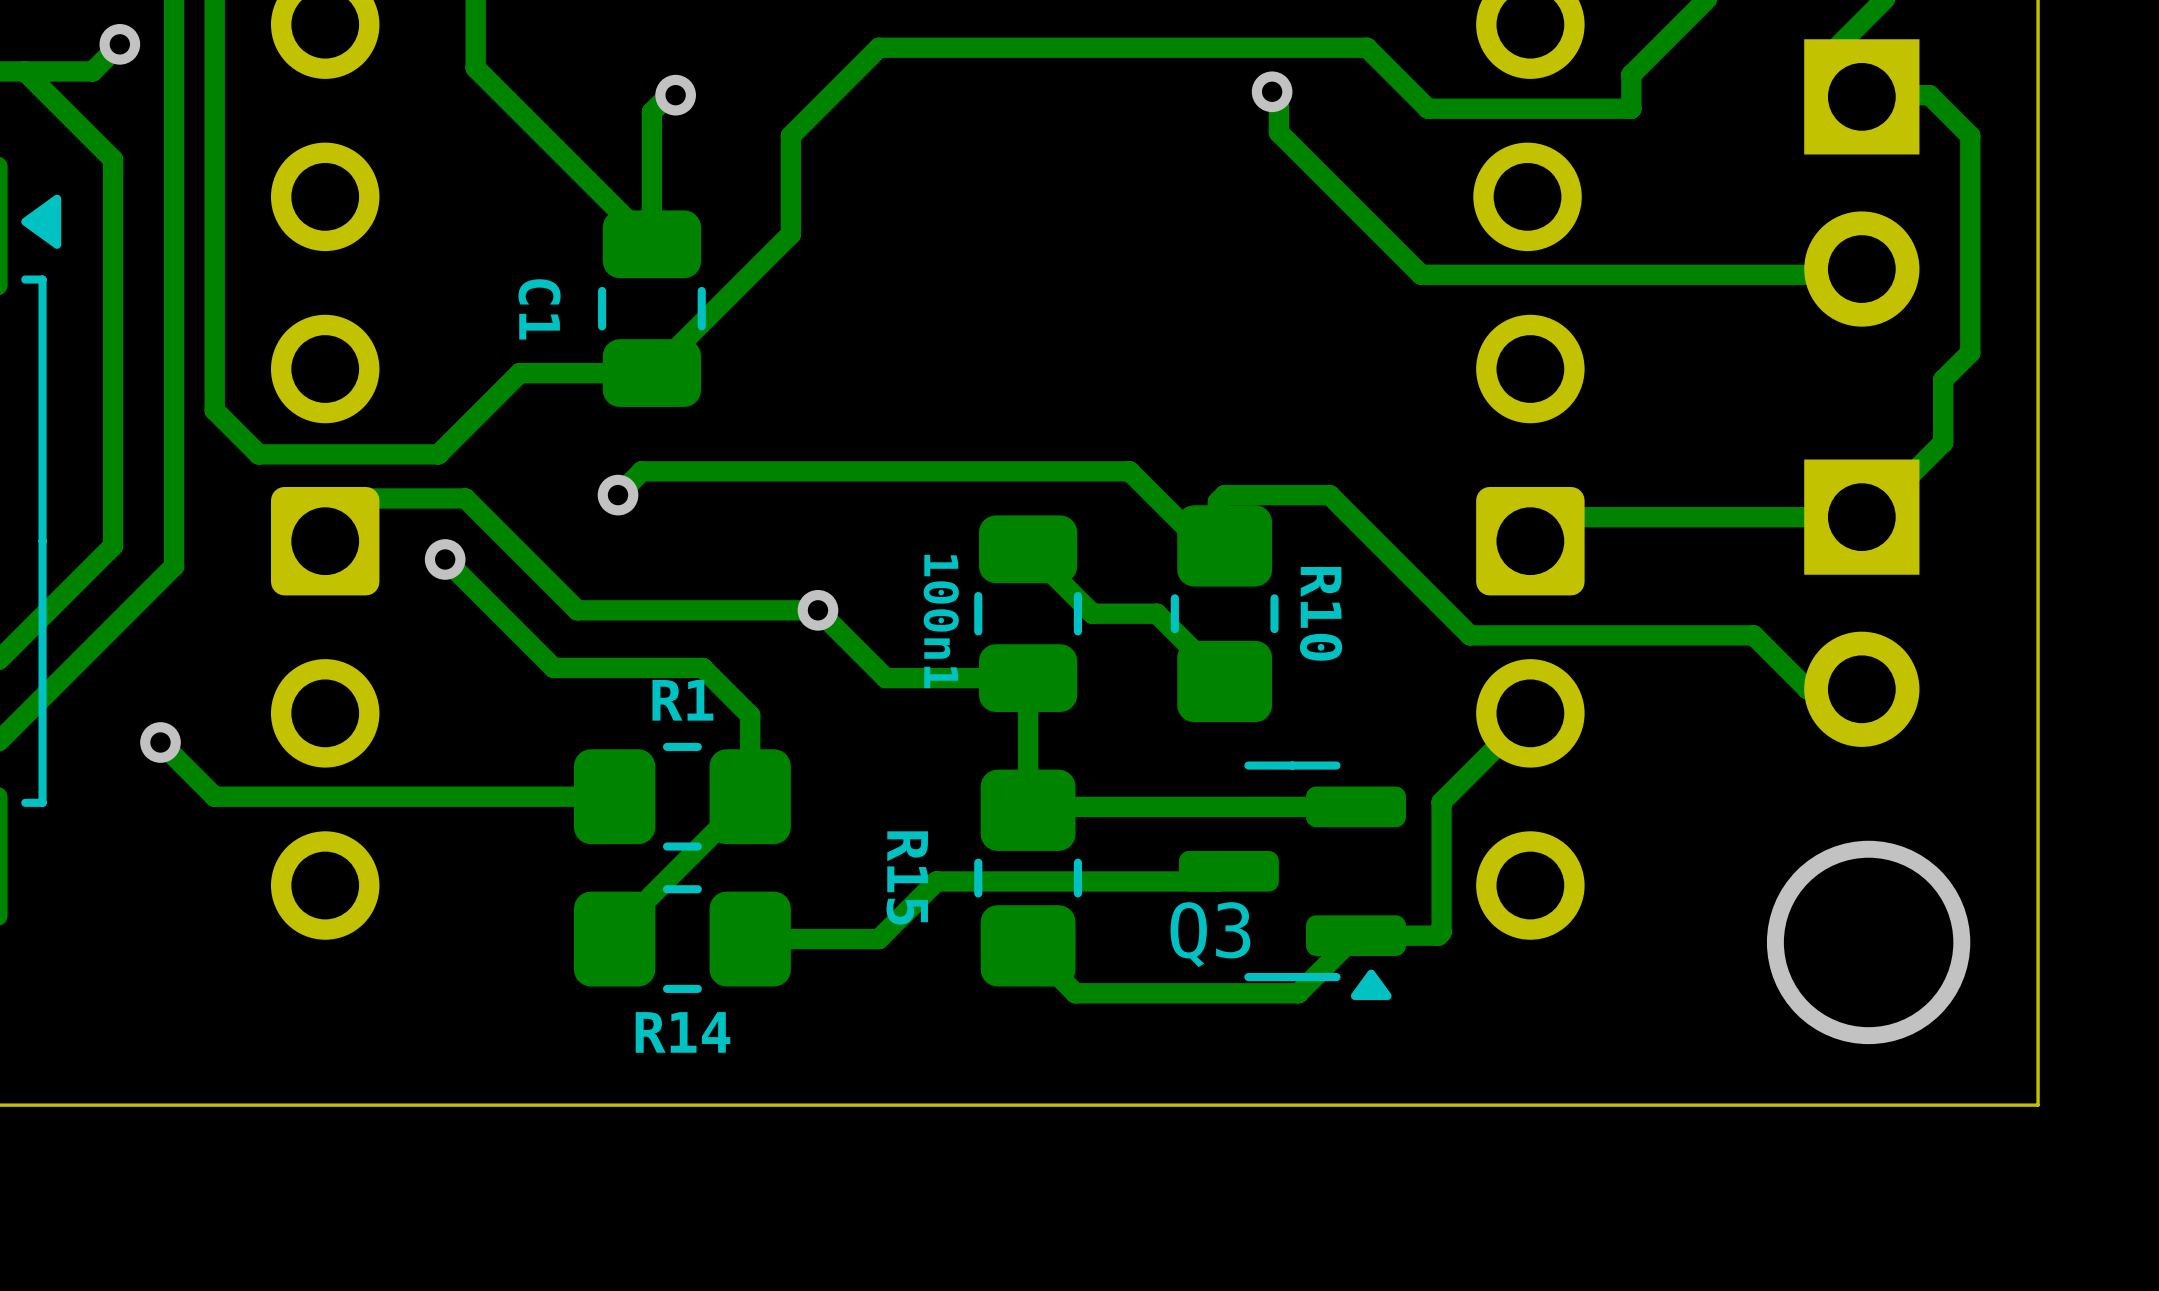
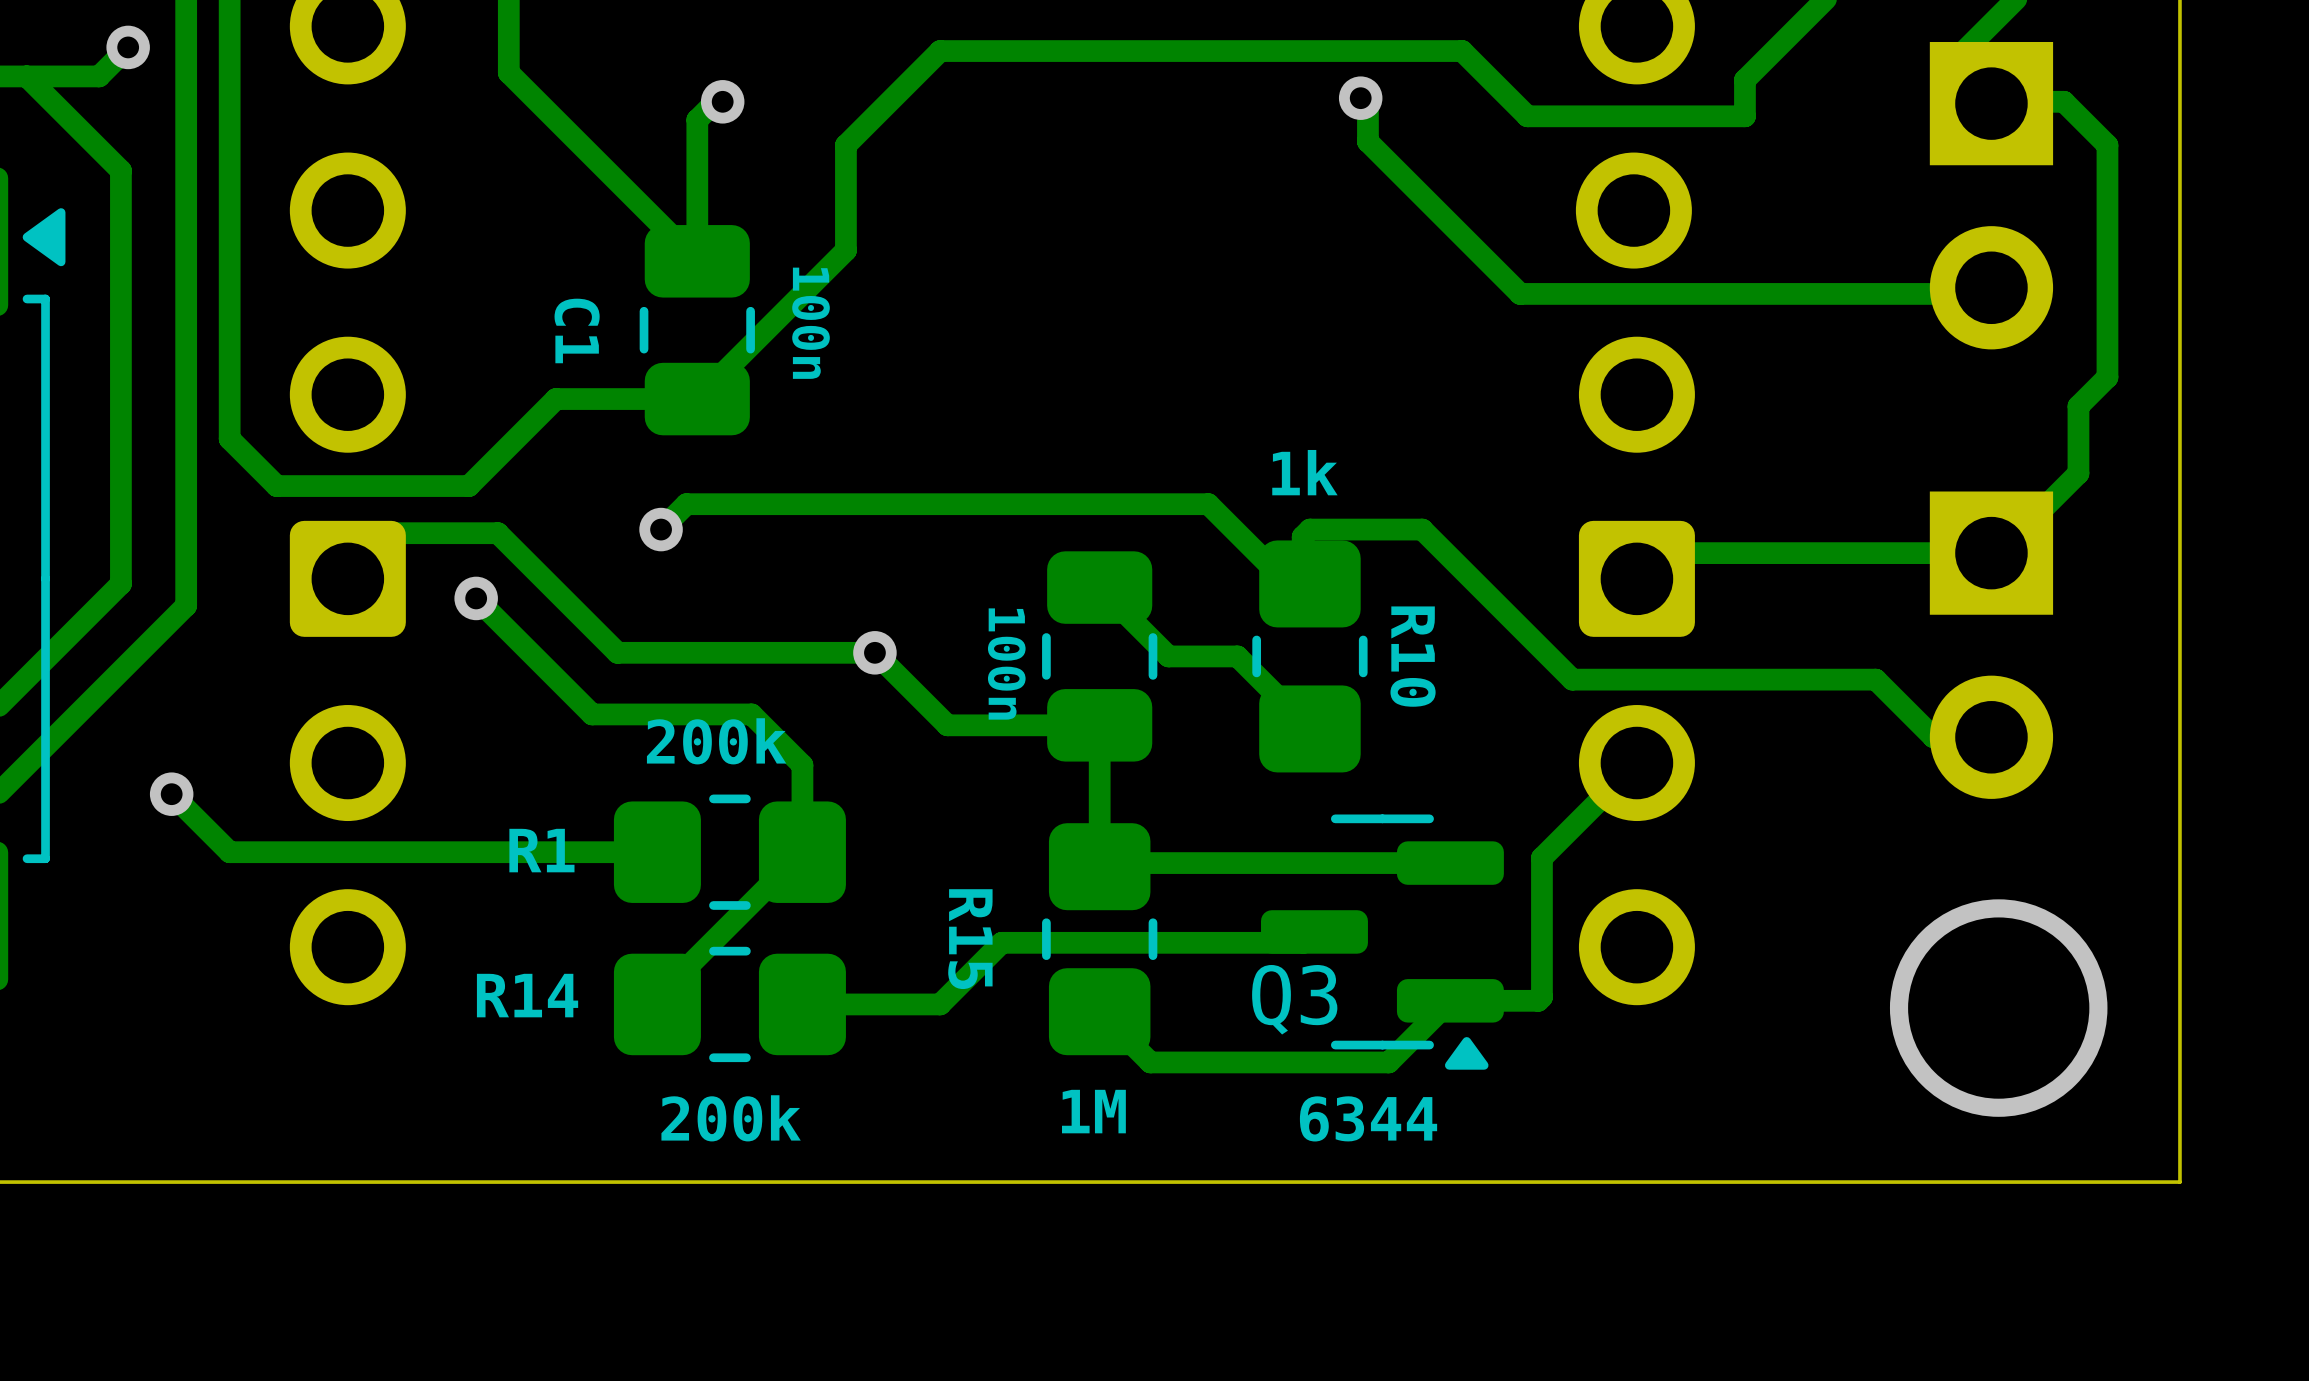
text: none -> 100n (811, 323)
text: none -> 1k (1304, 472)
100n1 name: 100n1 (941, 621) -> 100n (1006, 664)
text: none -> 200k (716, 741)
R1 name position: R1 (682, 700) -> R1 (541, 850)
R14 name position: R14 (682, 1032) -> R14 (527, 995)
text: none -> 1M (1093, 1111)
text: none -> 200k (731, 1118)
text: none -> 6344 (1368, 1118)

